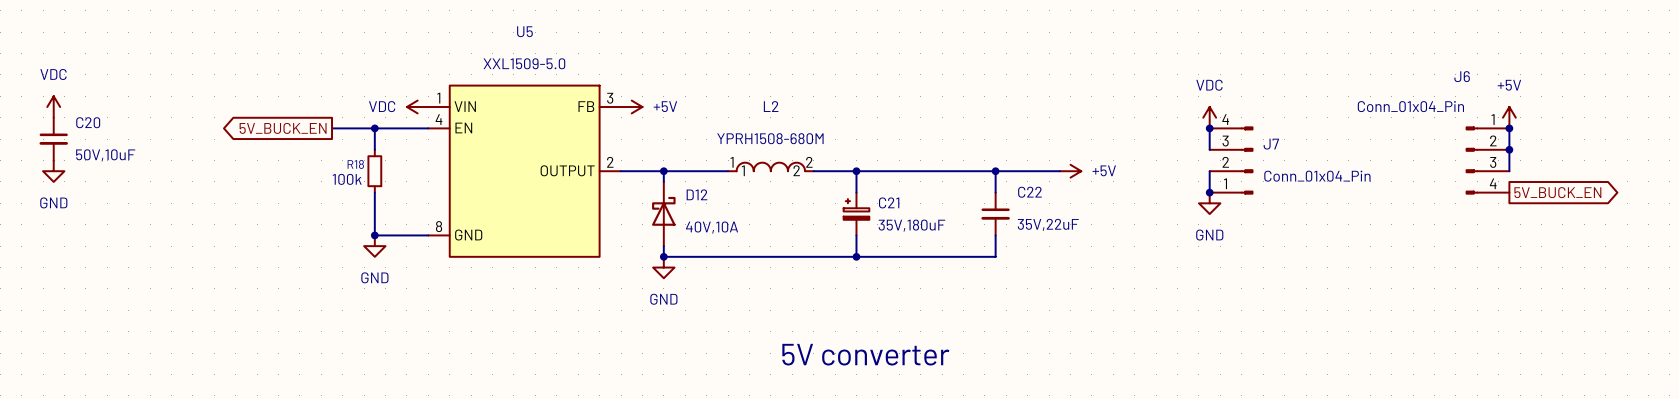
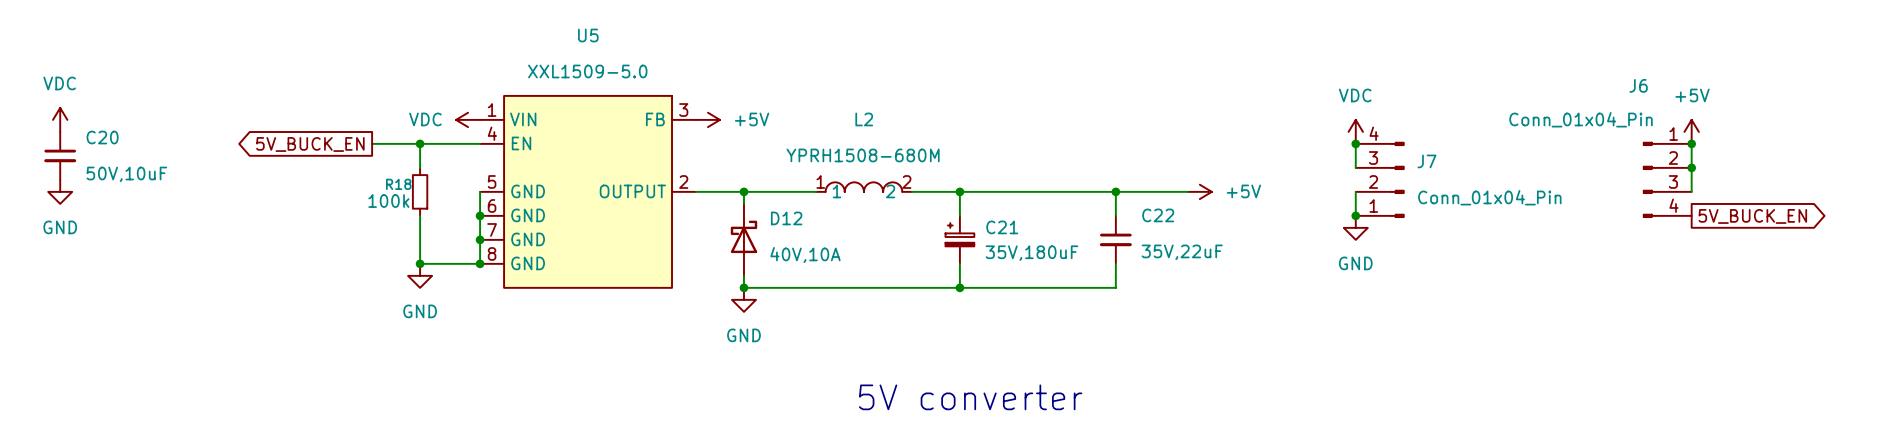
U5 symbol: [428, 85, 622, 257] -> [480, 95, 697, 288]
wire: none -> (480, 191) (480, 263)
junction: none -> (480, 215)
junction: none -> (480, 239)
junction: none -> (480, 263)

